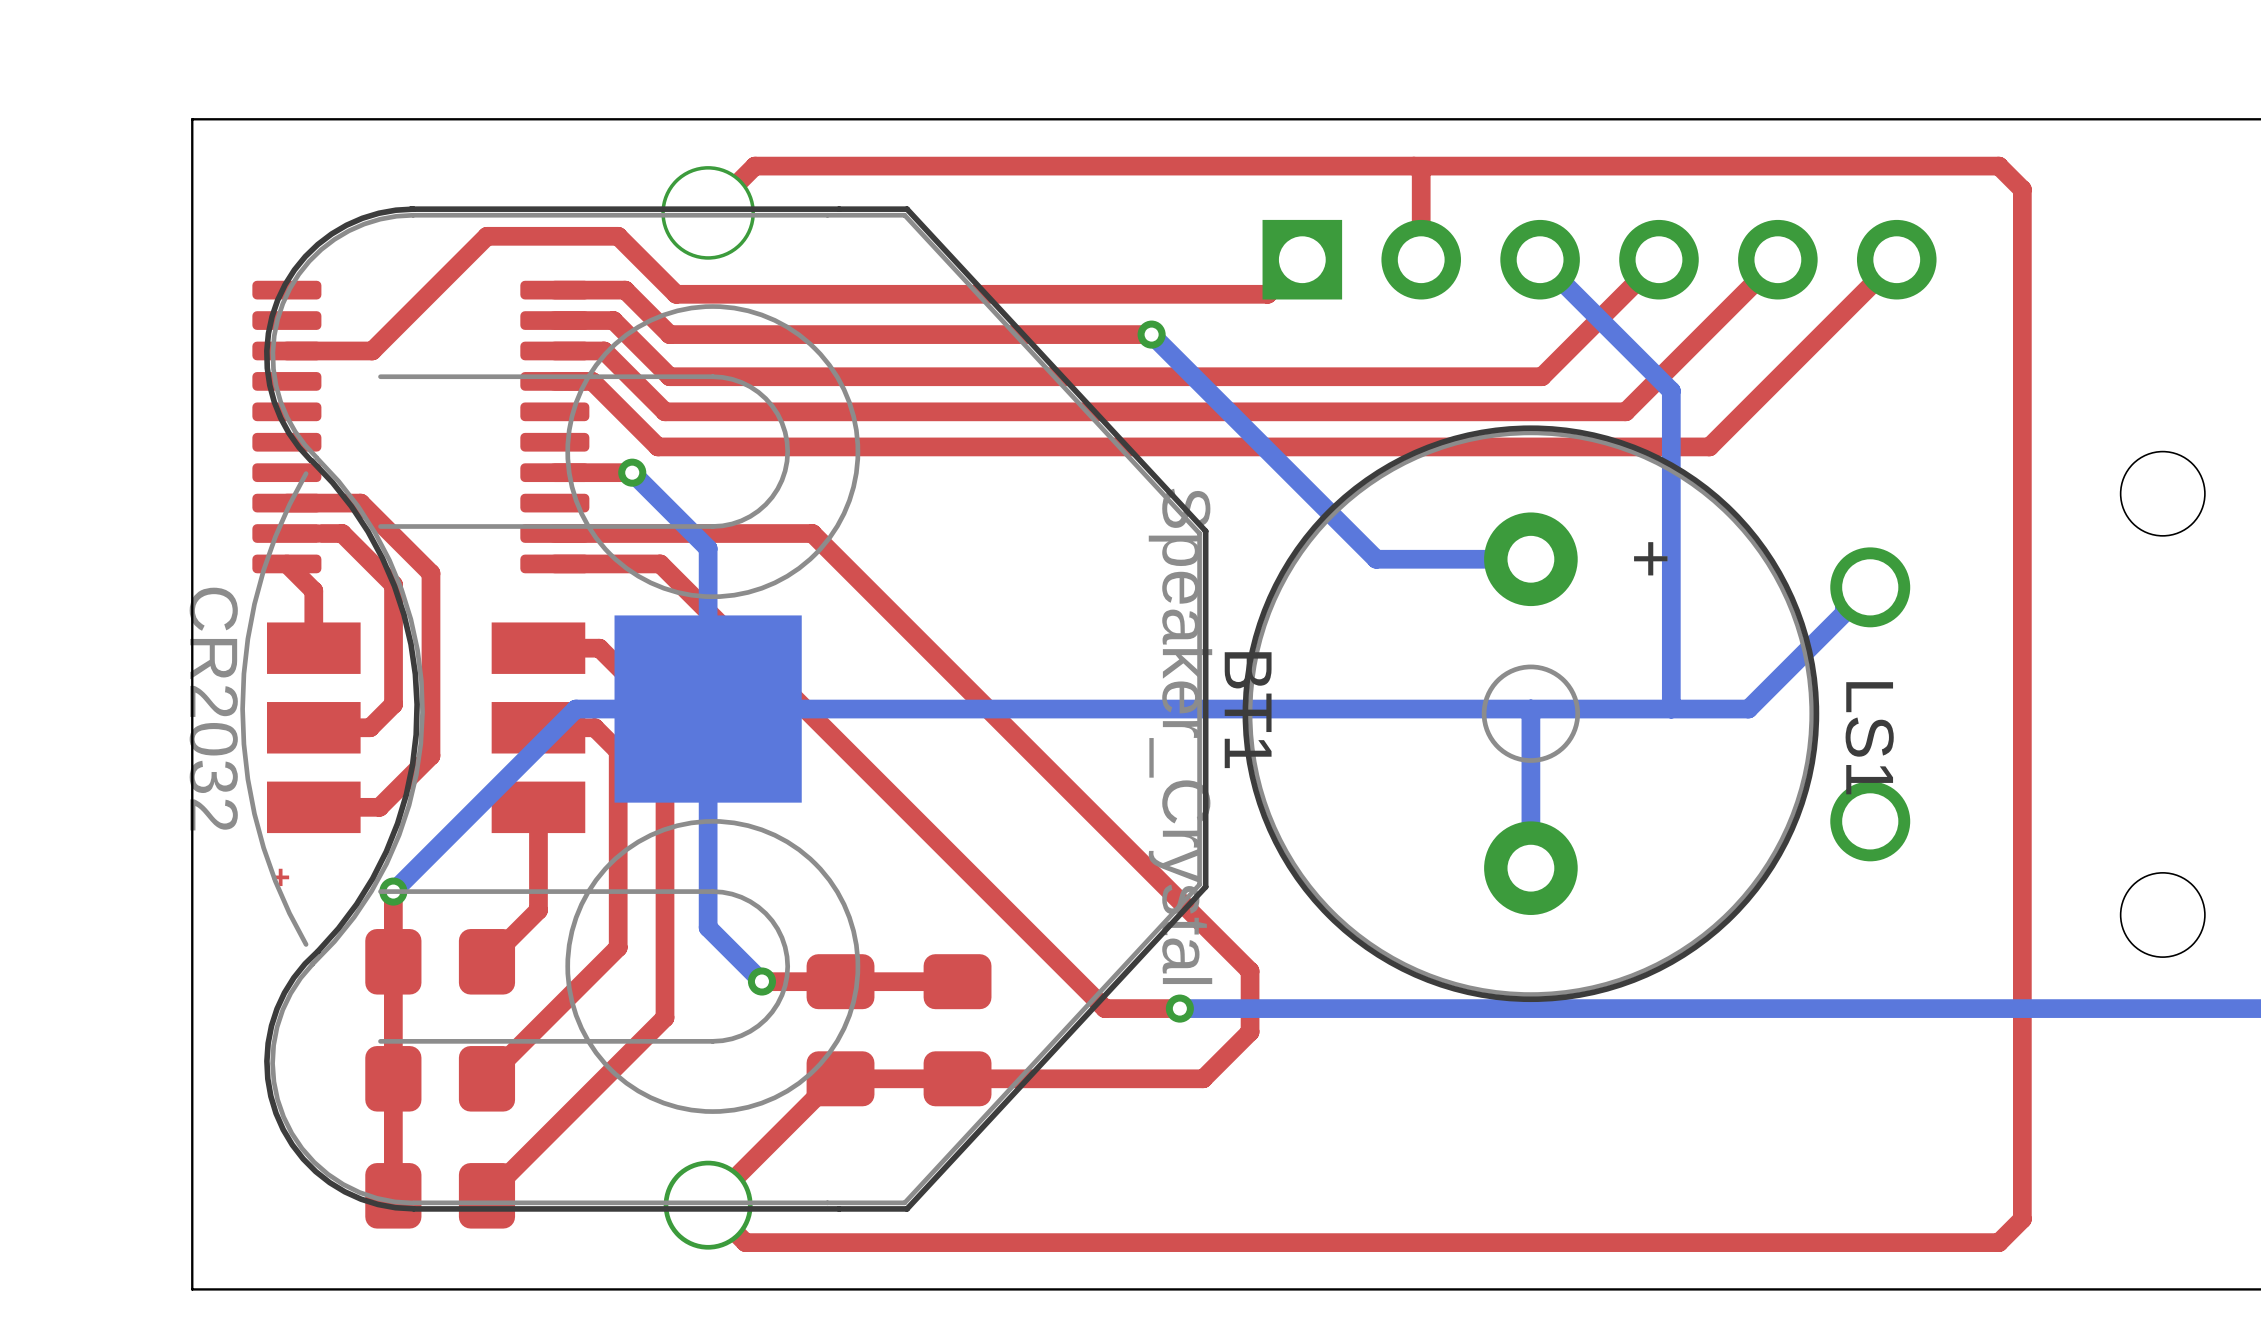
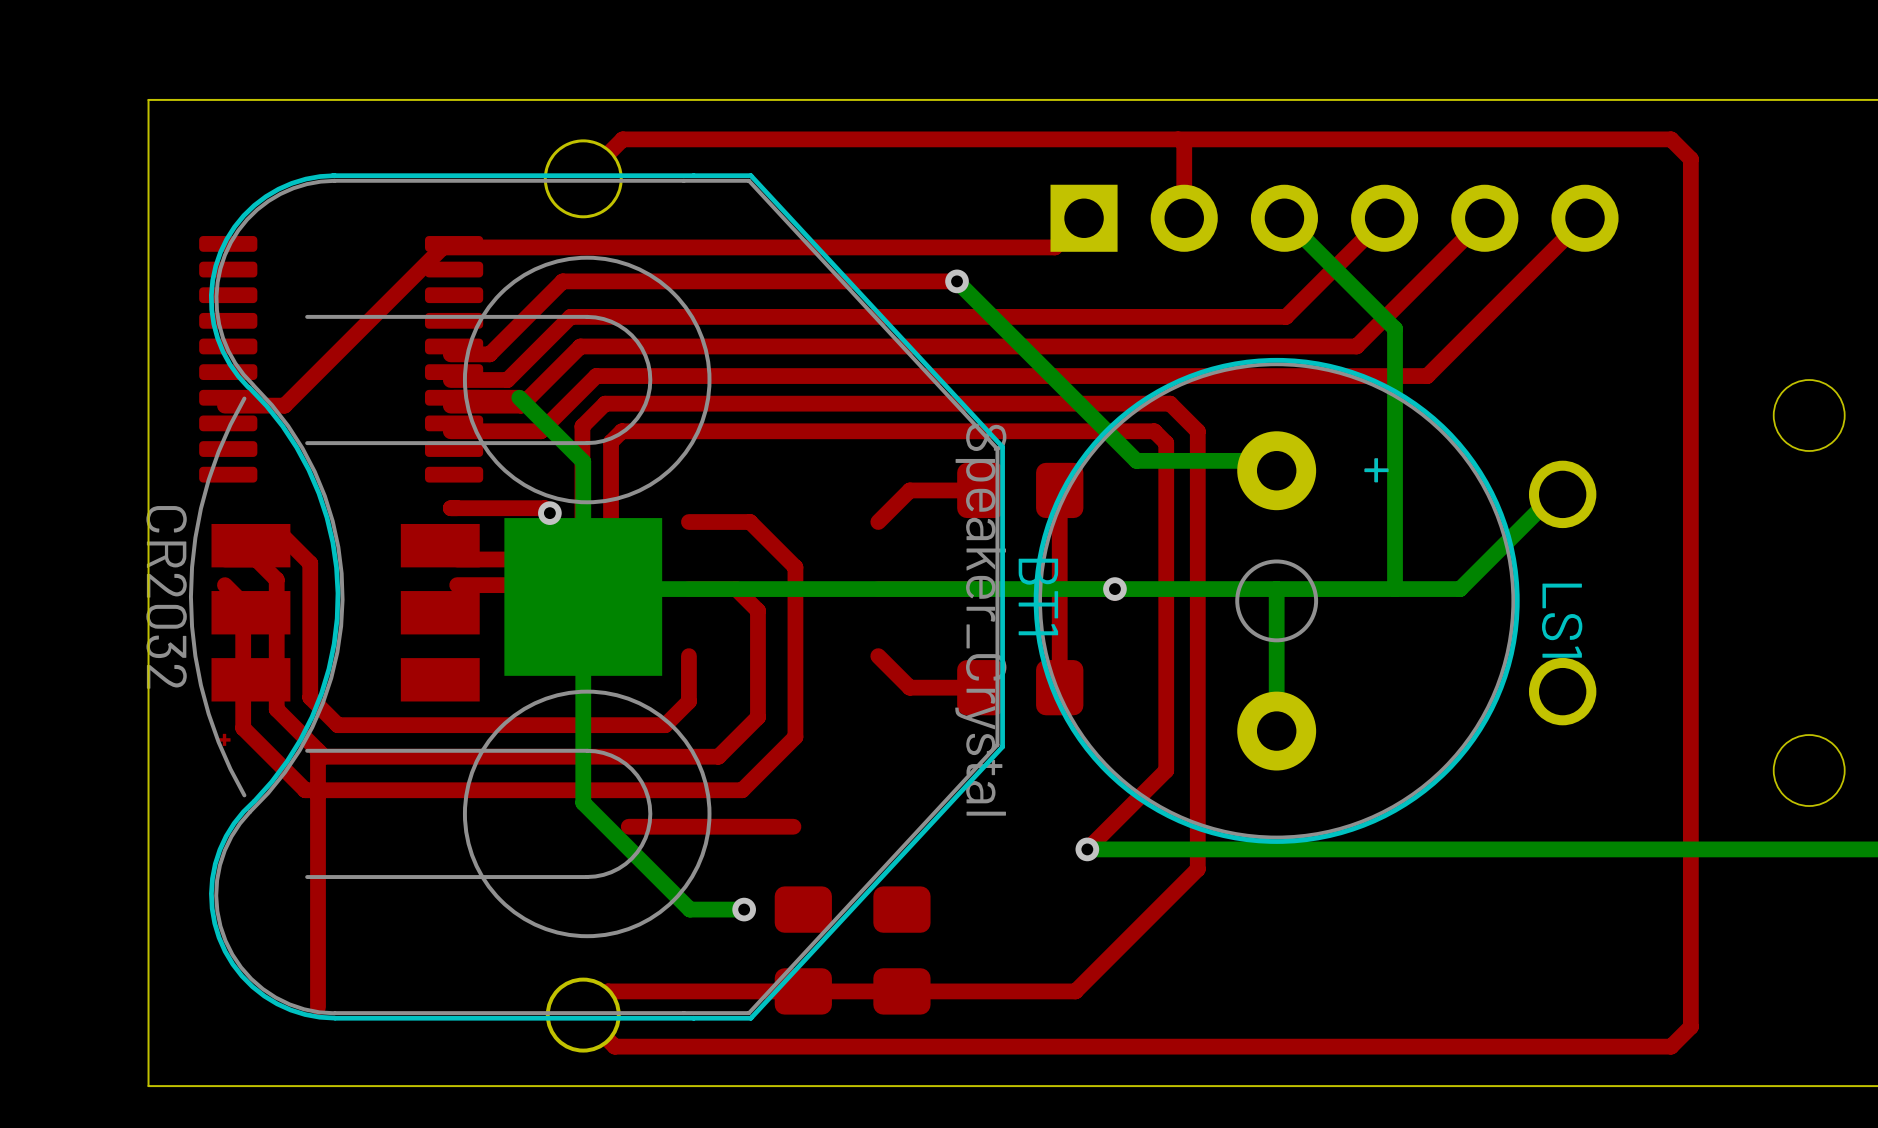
top track: (554, 290) (625, 290) (669, 334) (683, 334) -> (450, 354) (489, 354) (562, 281)
top track: (676, 294) (618, 236) (486, 236) (372, 350) (286, 350) -> (556, 247) (442, 247) (284, 405) (224, 405)
top track: (554, 320) (613, 320) (669, 376) (693, 376) -> (450, 380) (507, 380) (570, 316)
top track: (554, 350) (604, 350) (665, 411) (704, 411) -> (450, 405) (521, 405) (580, 346)
top track: (554, 381) (592, 381) (657, 446) (723, 446) -> (450, 431) (541, 431) (596, 376)
via position: (632, 472) -> (549, 513)
top track: (286, 503) (360, 503) (430, 573) (430, 755) (379, 807) (292, 807) -> none
top track: (286, 533) (342, 533) (393, 584) (393, 704) (370, 727) (334, 727) -> none
top track: (554, 533) (812, 533) (1058, 779) -> none
bottom track: (1364, 547) (1376, 559) (1530, 559) -> (1136, 460) (1266, 460)
top track: (286, 563) (313, 590) (313, 648) -> none
top track: (554, 563) (660, 563) (1104, 1008) (1179, 1008) -> none
top track: none -> (980, 490) (909, 490) (878, 522)
part: none -> (1020, 490)
top track: none -> (1059, 490) (1059, 687)
top track: none -> (450, 508) (544, 508) (549, 513)
bottom track: (1844, 603) (1844, 613) (1748, 709) (575, 709) (393, 891) -> (1540, 508) (1460, 589) (583, 589)
top track: none -> (688, 522) (750, 522) (795, 567) (795, 736) (742, 790) (305, 790) (243, 728) (243, 603) (224, 585)
top track: none -> (224, 533) (280, 533) (310, 563) (310, 697) (337, 725) (665, 725) (688, 701) (688, 656)
top track: (538, 648) (599, 648) (665, 713) (665, 1017) (486, 1195) -> none
top track: none -> (224, 559) (256, 559) (276, 579) (276, 709) (324, 756) (718, 756) (757, 717) (757, 610) (736, 589) (688, 589) (706, 589)
top track: none -> (457, 585) (586, 585) (611, 560) (611, 442) (621, 431) (1154, 431) (1166, 443) (1166, 770) (1087, 849)
via: none -> (1114, 589)
top track: (538, 727) (594, 727) (618, 751) (618, 947) (486, 1078) -> none
top track: (538, 807) (538, 910) (486, 961) -> none
top track: (1095, 816) (1250, 971) (1250, 1031) (1203, 1078) (834, 1078) (708, 1205) -> (457, 559) (576, 559) (582, 553) (582, 426) (605, 403) (1170, 403) (1197, 431) (1197, 869) (1075, 991) (607, 991) (583, 1016)
top track: none -> (980, 687) (909, 687)
part: none -> (1020, 687)
via: (393, 891) -> none
bottom track: (708, 927) (761, 981) -> (583, 781) (583, 802) (689, 909) (744, 909)
part: (440, 961) -> none
via: (761, 981) -> none
via position: (1179, 1008) -> (1087, 849)
bottom track: (1306, 1008) (1179, 1008) -> none
part: (840, 1030) -> none
part: (957, 1030) -> none
part: (440, 1078) -> none
via: none -> (744, 909)
part: none -> (803, 950)
part: none -> (901, 950)
part: (440, 1195) -> none

